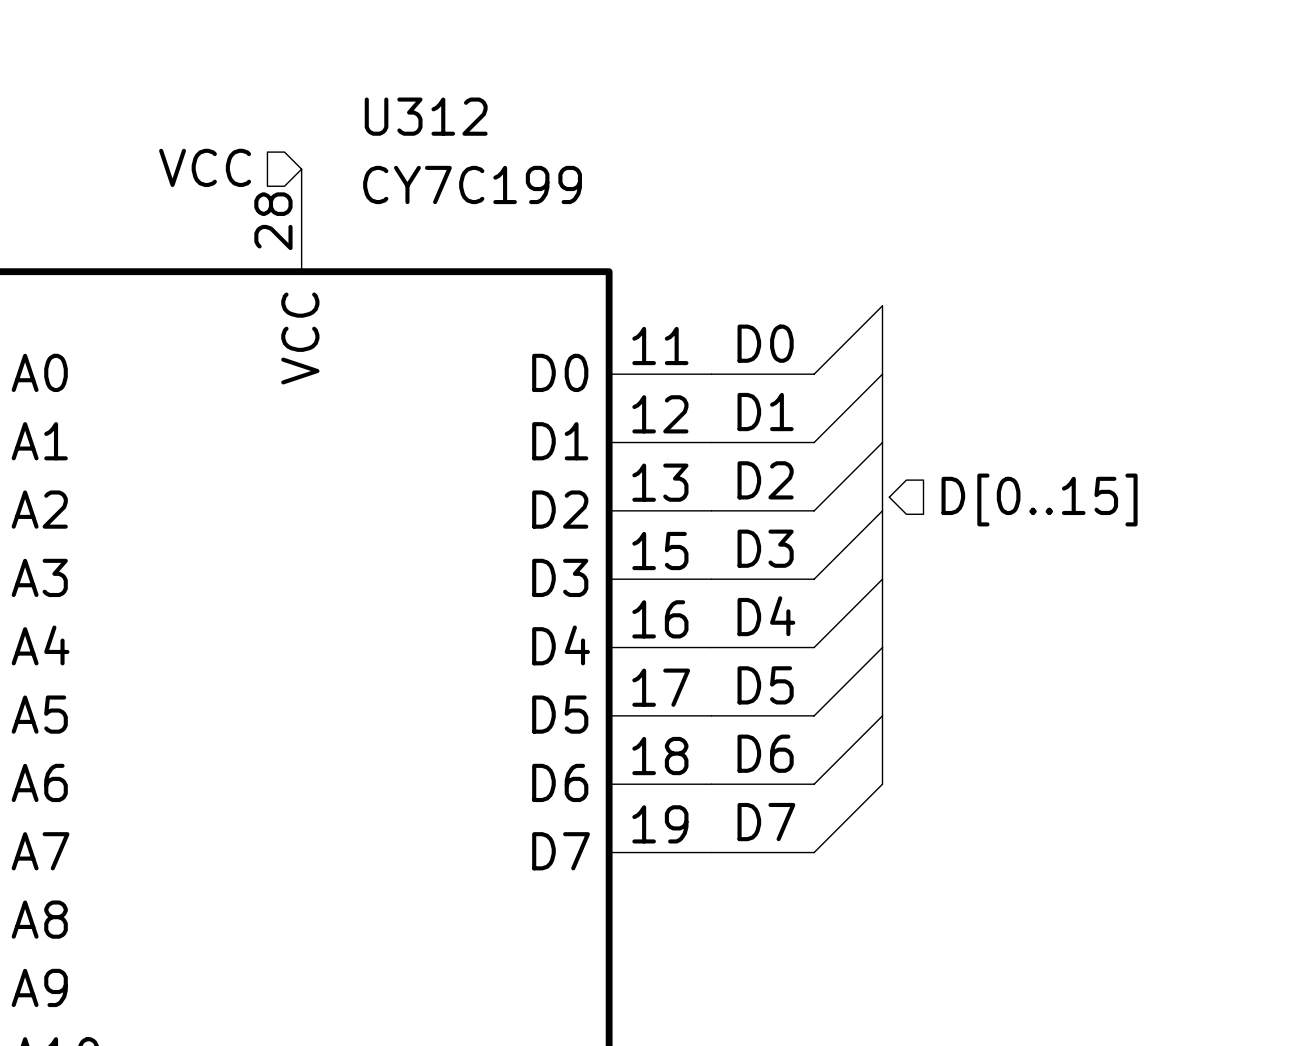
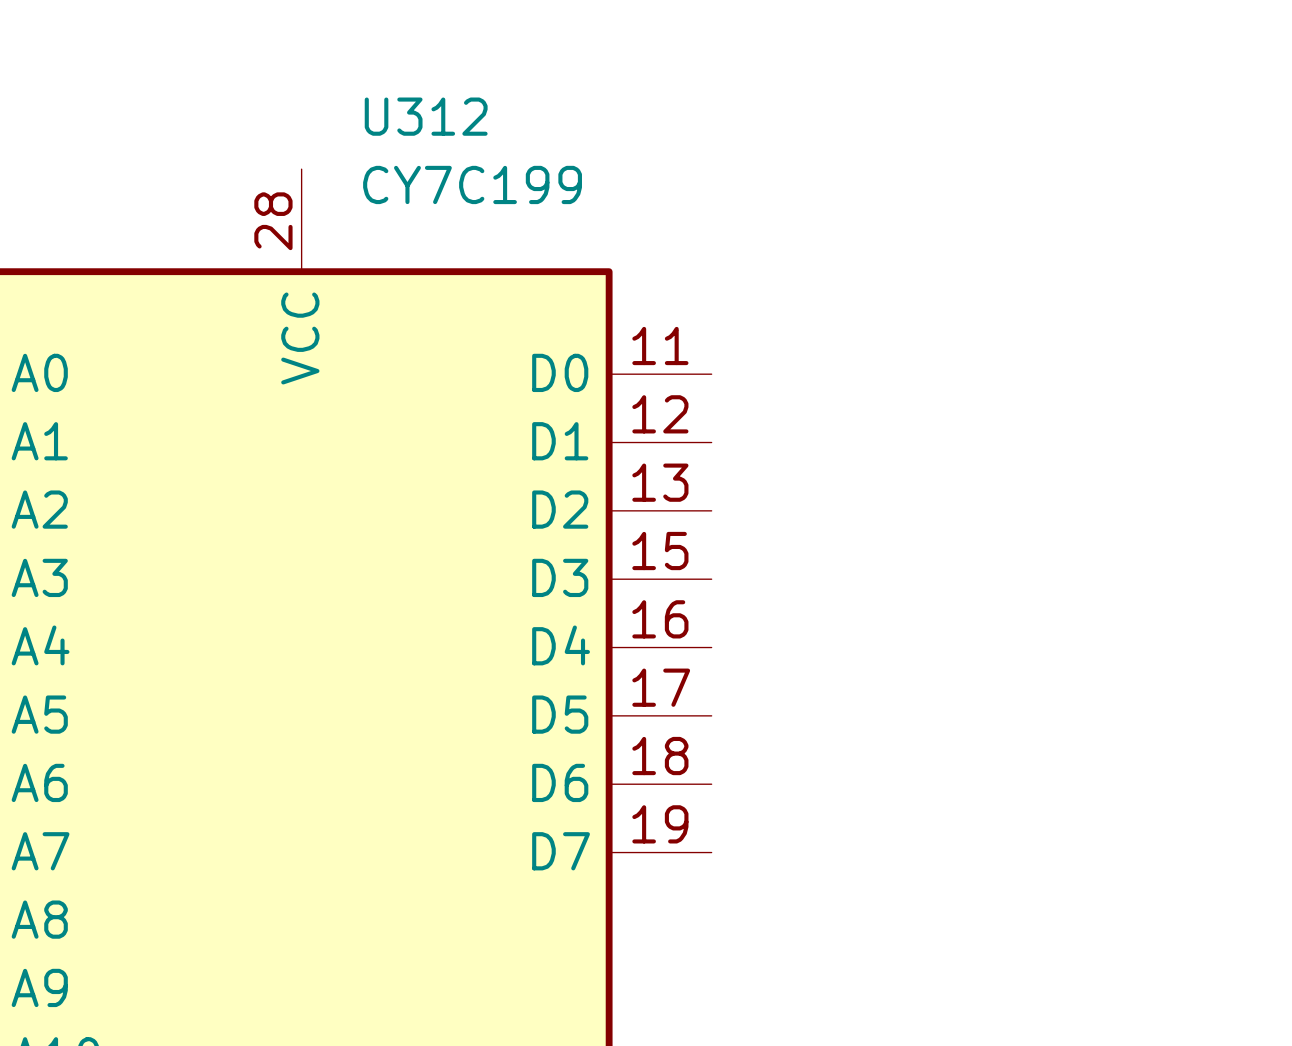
hierarchical label: VCC (205, 167) -> none
wire: (882, 305) (814, 374) (711, 374) -> none
bus: (882, 305) (882, 784) -> none
label: D0 (765, 343) -> none
wire: (882, 374) (814, 442) (711, 442) -> none
label: D1 (765, 412) -> none
wire: (882, 442) (814, 510) (711, 510) -> none
label: D2 (765, 480) -> none
hierarchical label: D[0..15] (1039, 499) -> none
wire: (882, 510) (814, 579) (711, 579) -> none
label: D3 (765, 548) -> none
wire: (882, 579) (814, 647) (711, 647) -> none
label: D4 (766, 616) -> none
wire: (882, 647) (814, 715) (711, 715) -> none
label: D5 (765, 685) -> none
wire: (882, 715) (814, 784) (711, 784) -> none
label: D6 (765, 753) -> none
wire: (882, 784) (814, 852) (711, 852) -> none
label: D7 (766, 822) -> none

